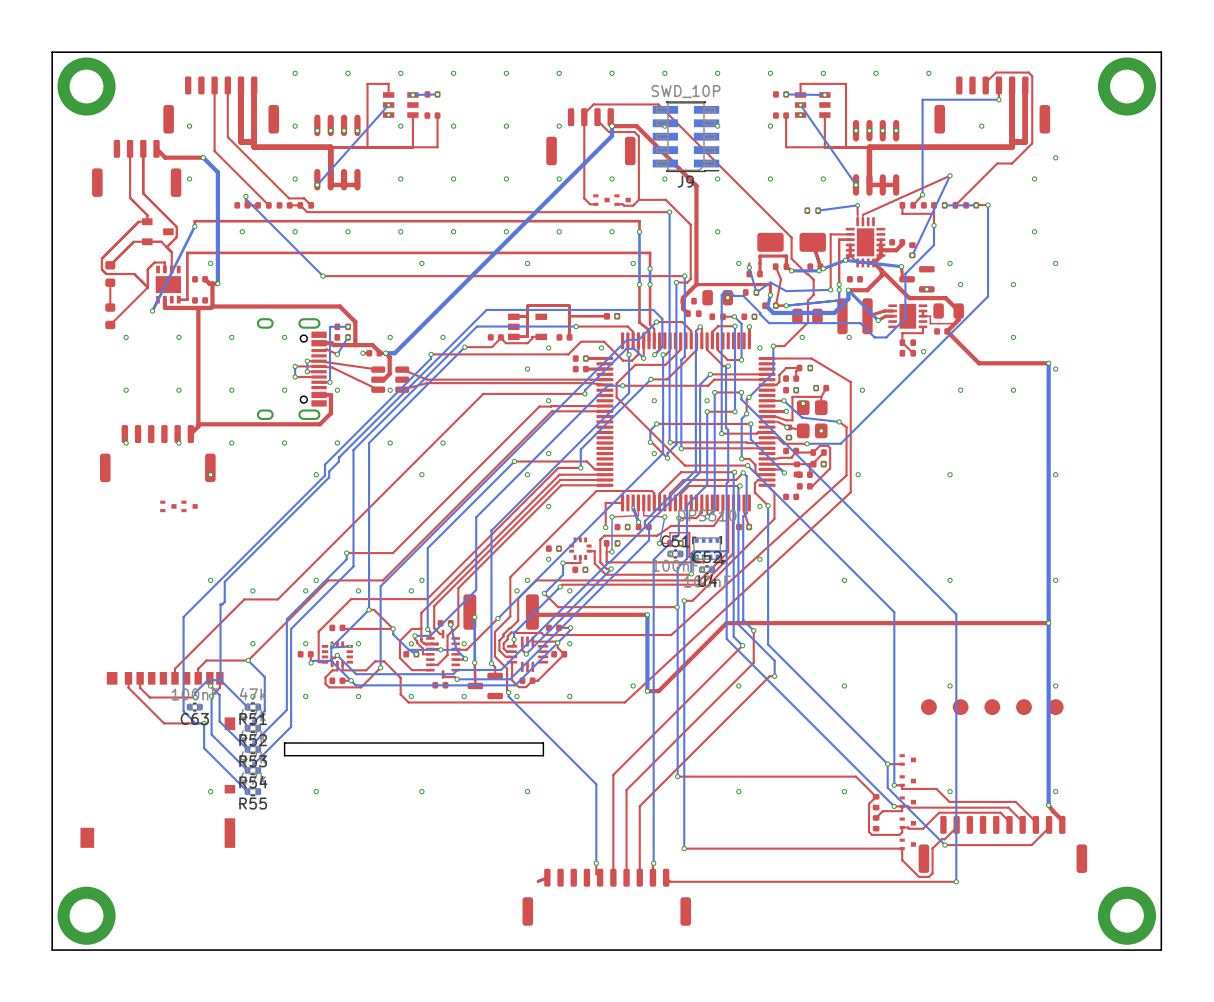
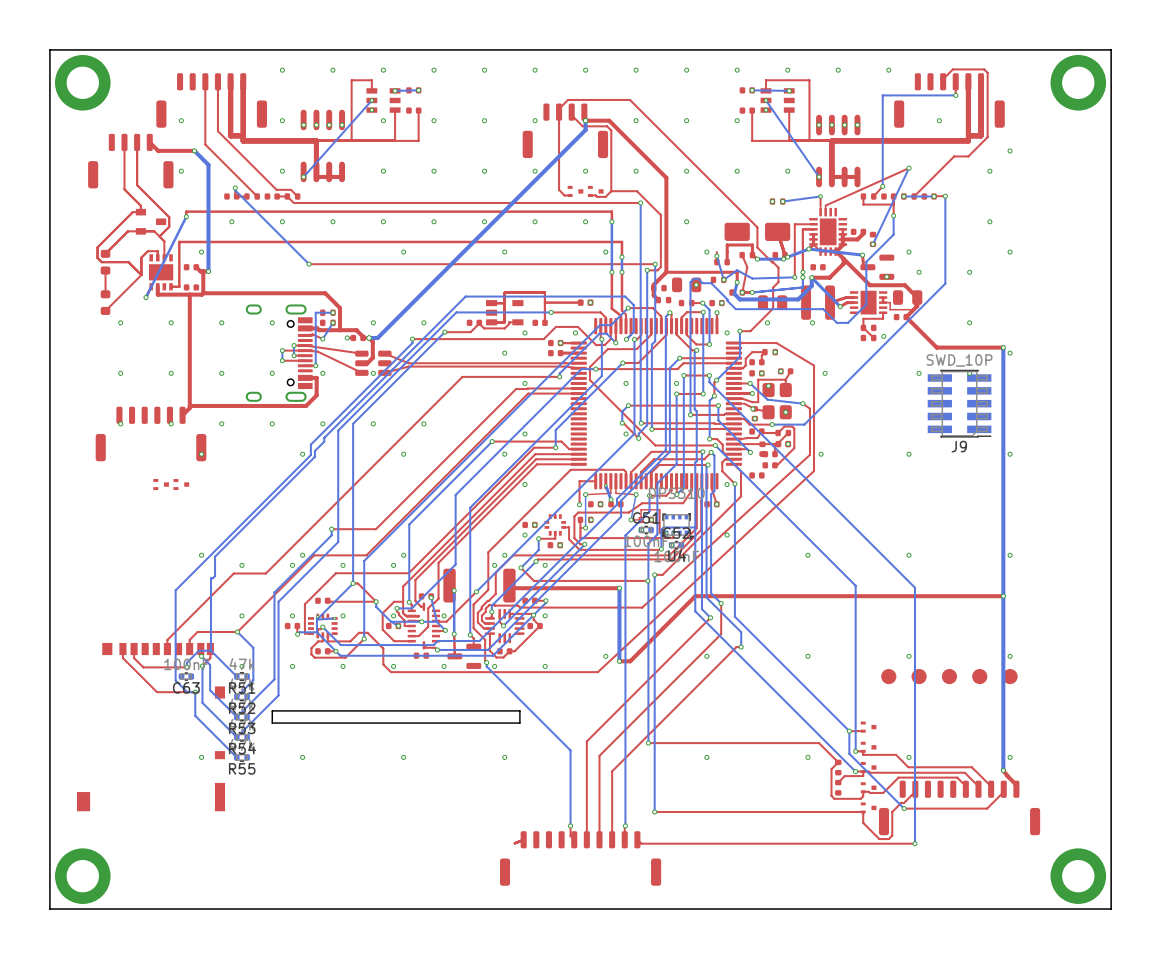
J9 position: (685, 136) -> (959, 403)

